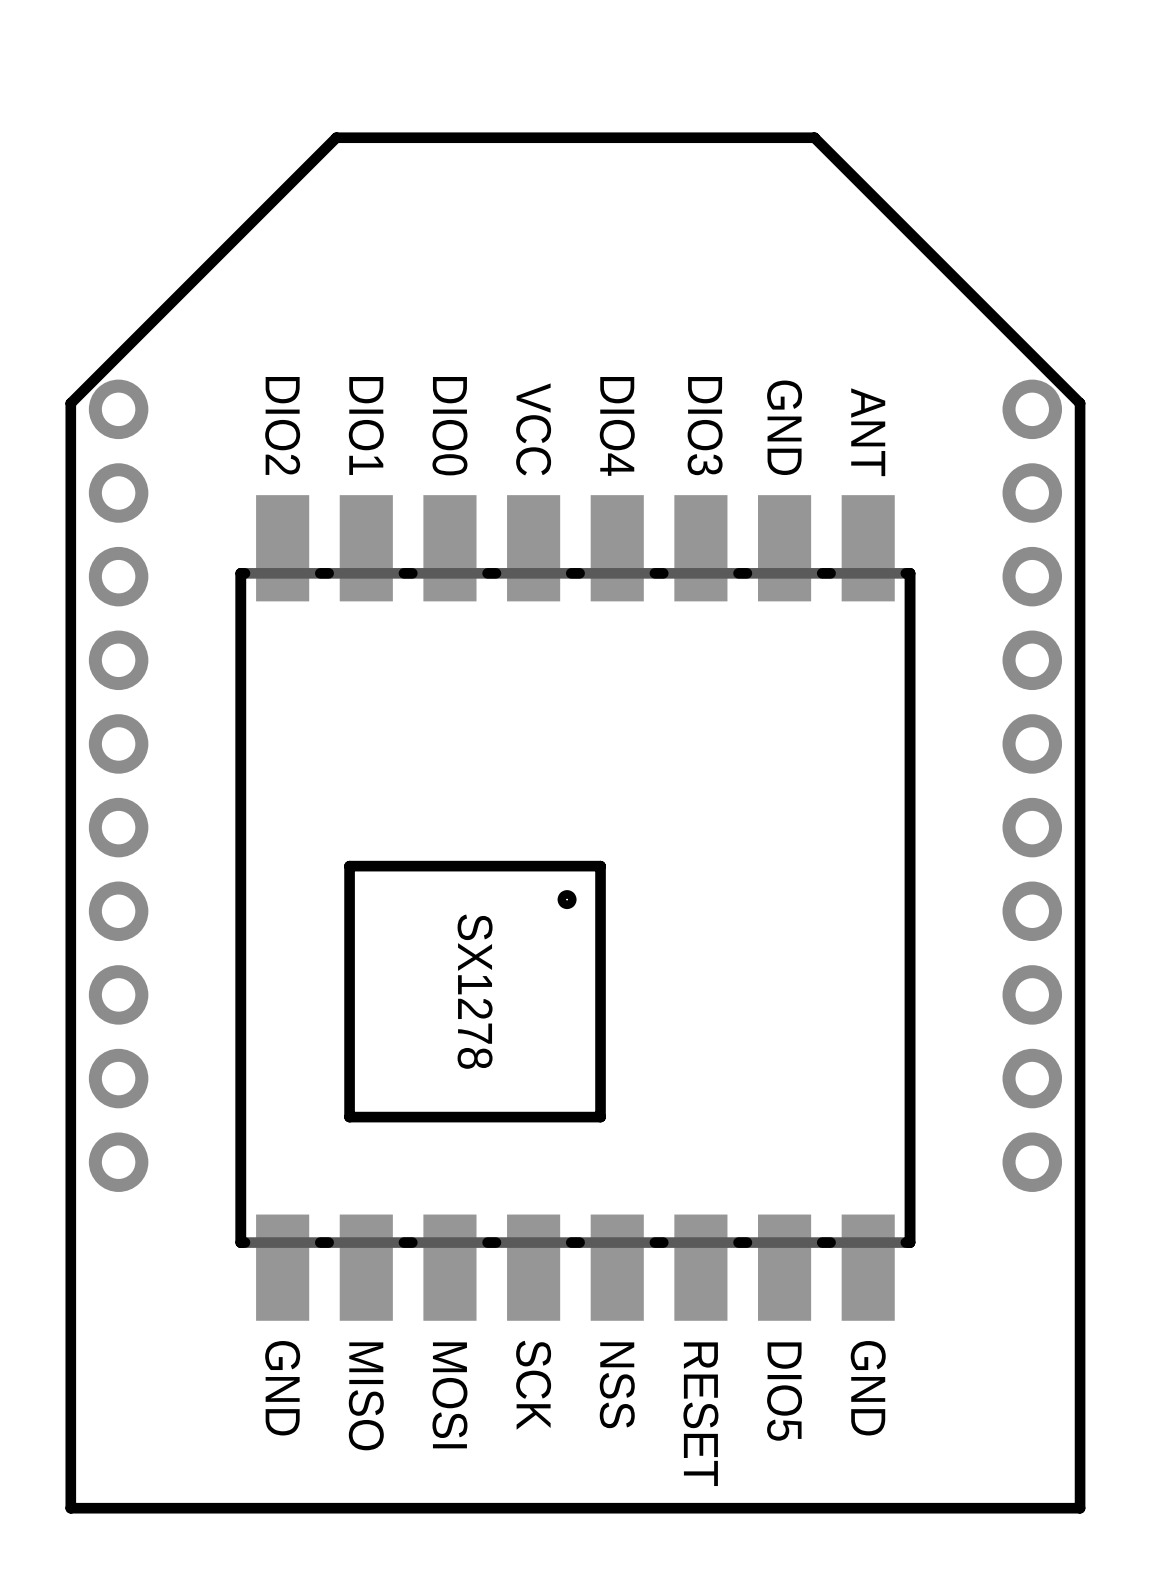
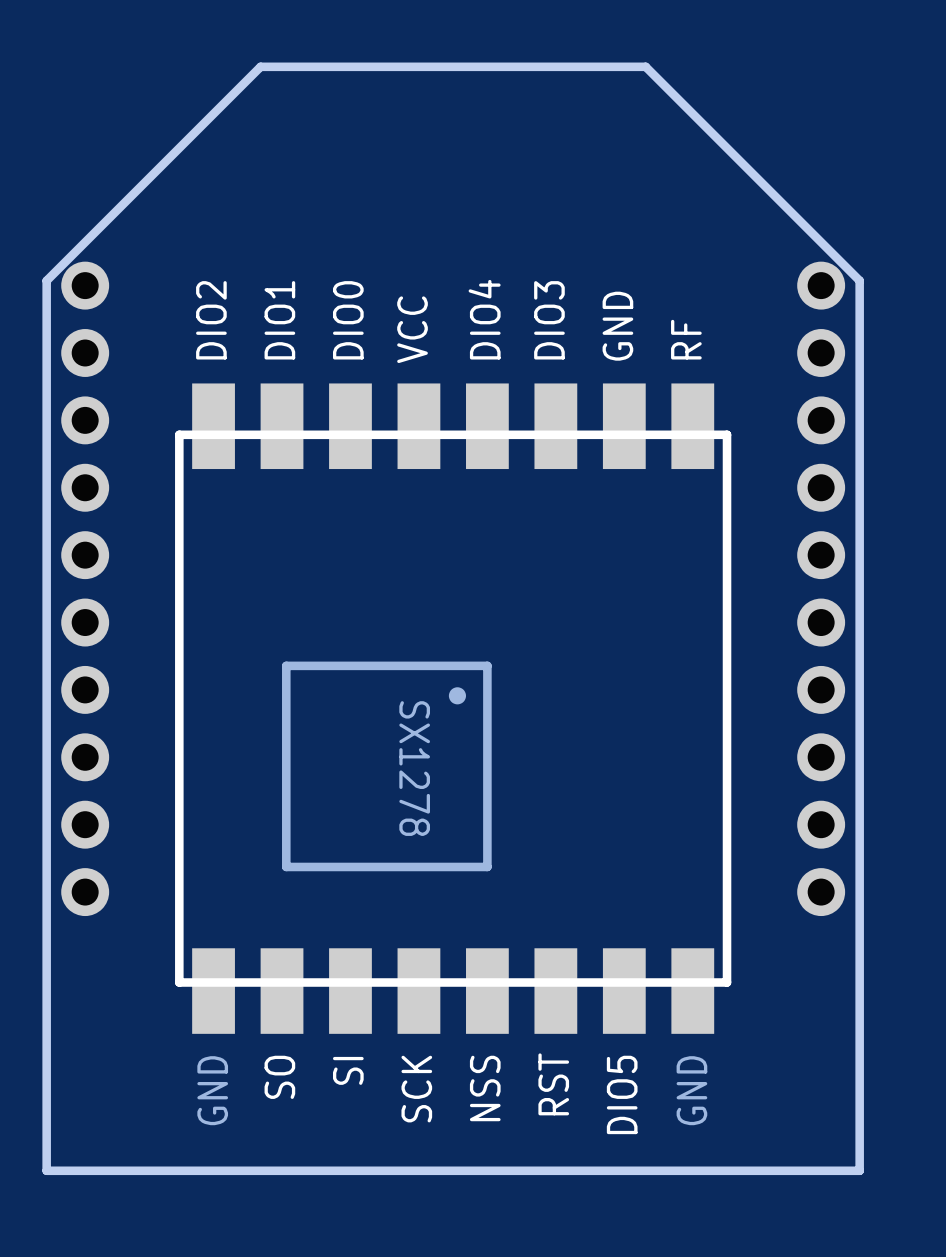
DIO2: none -> (213, 426)
DIO1: none -> (282, 426)
DIO0: none -> (350, 426)
VCC: none -> (418, 426)
DIO4: none -> (487, 426)
DIO3: none -> (555, 426)
GND: none -> (624, 426)
RF: none -> (692, 426)
line: none -> (727, 434) (179, 434) (179, 982) (727, 982) (727, 434)
line: none -> (487, 665) (487, 866) (286, 866) (286, 665) (487, 665)
drawing: none -> [448, 687, 467, 705]
part: (575, 907) -> none
text: none -> SX1278 (414, 768)
part: none -> (213, 991)
SO: none -> (282, 991)
SI: none -> (350, 991)
SCK: none -> (418, 991)
NSS: none -> (487, 991)
RST: none -> (555, 991)
DIO5: none -> (624, 991)
part: none -> (692, 991)
text: none -> GND (212, 1090)
text: none -> GND (691, 1090)

